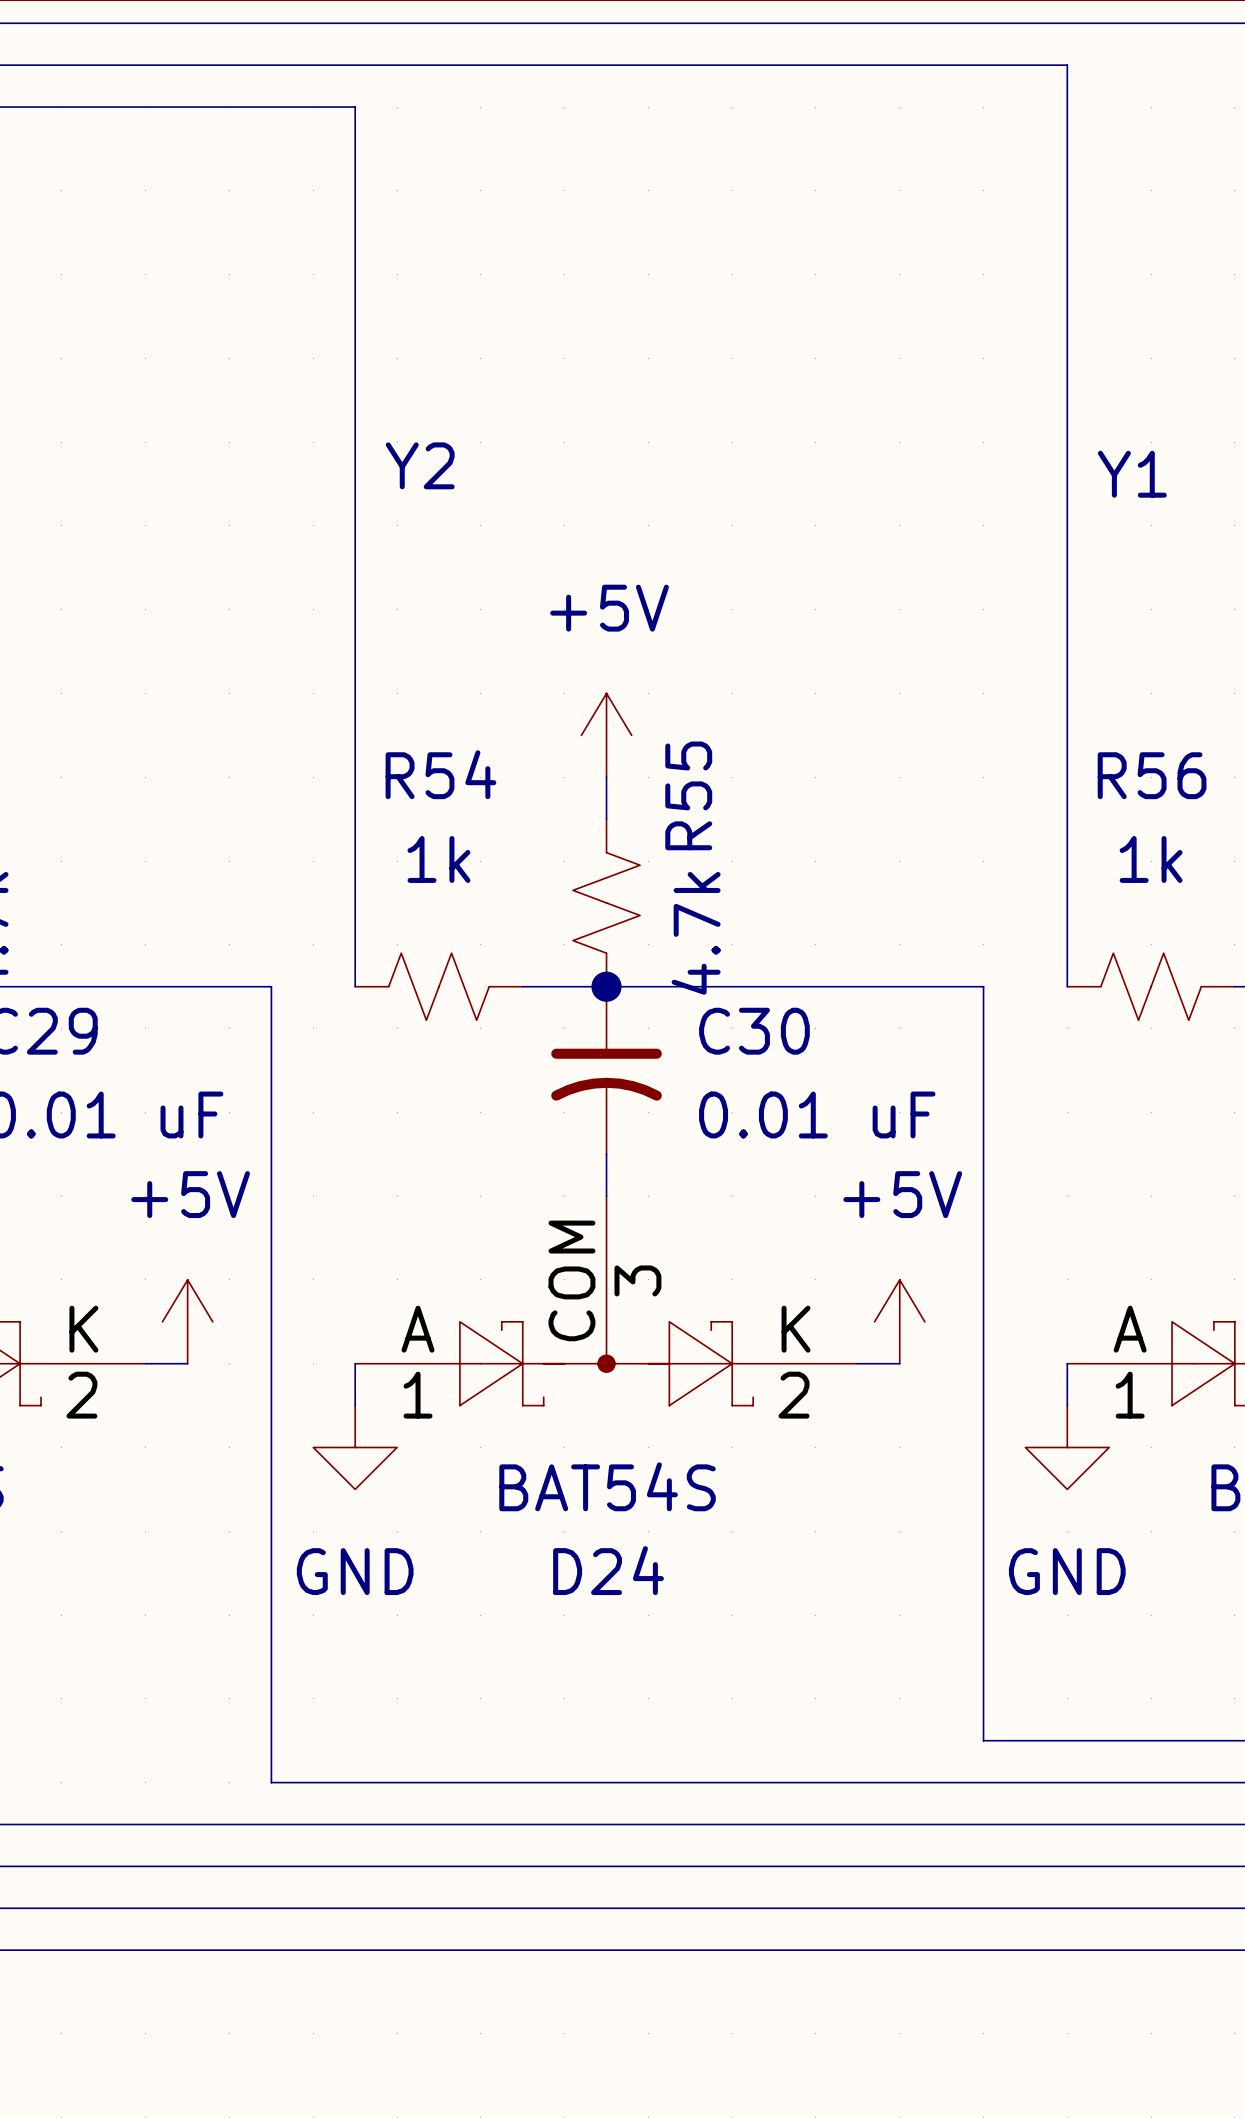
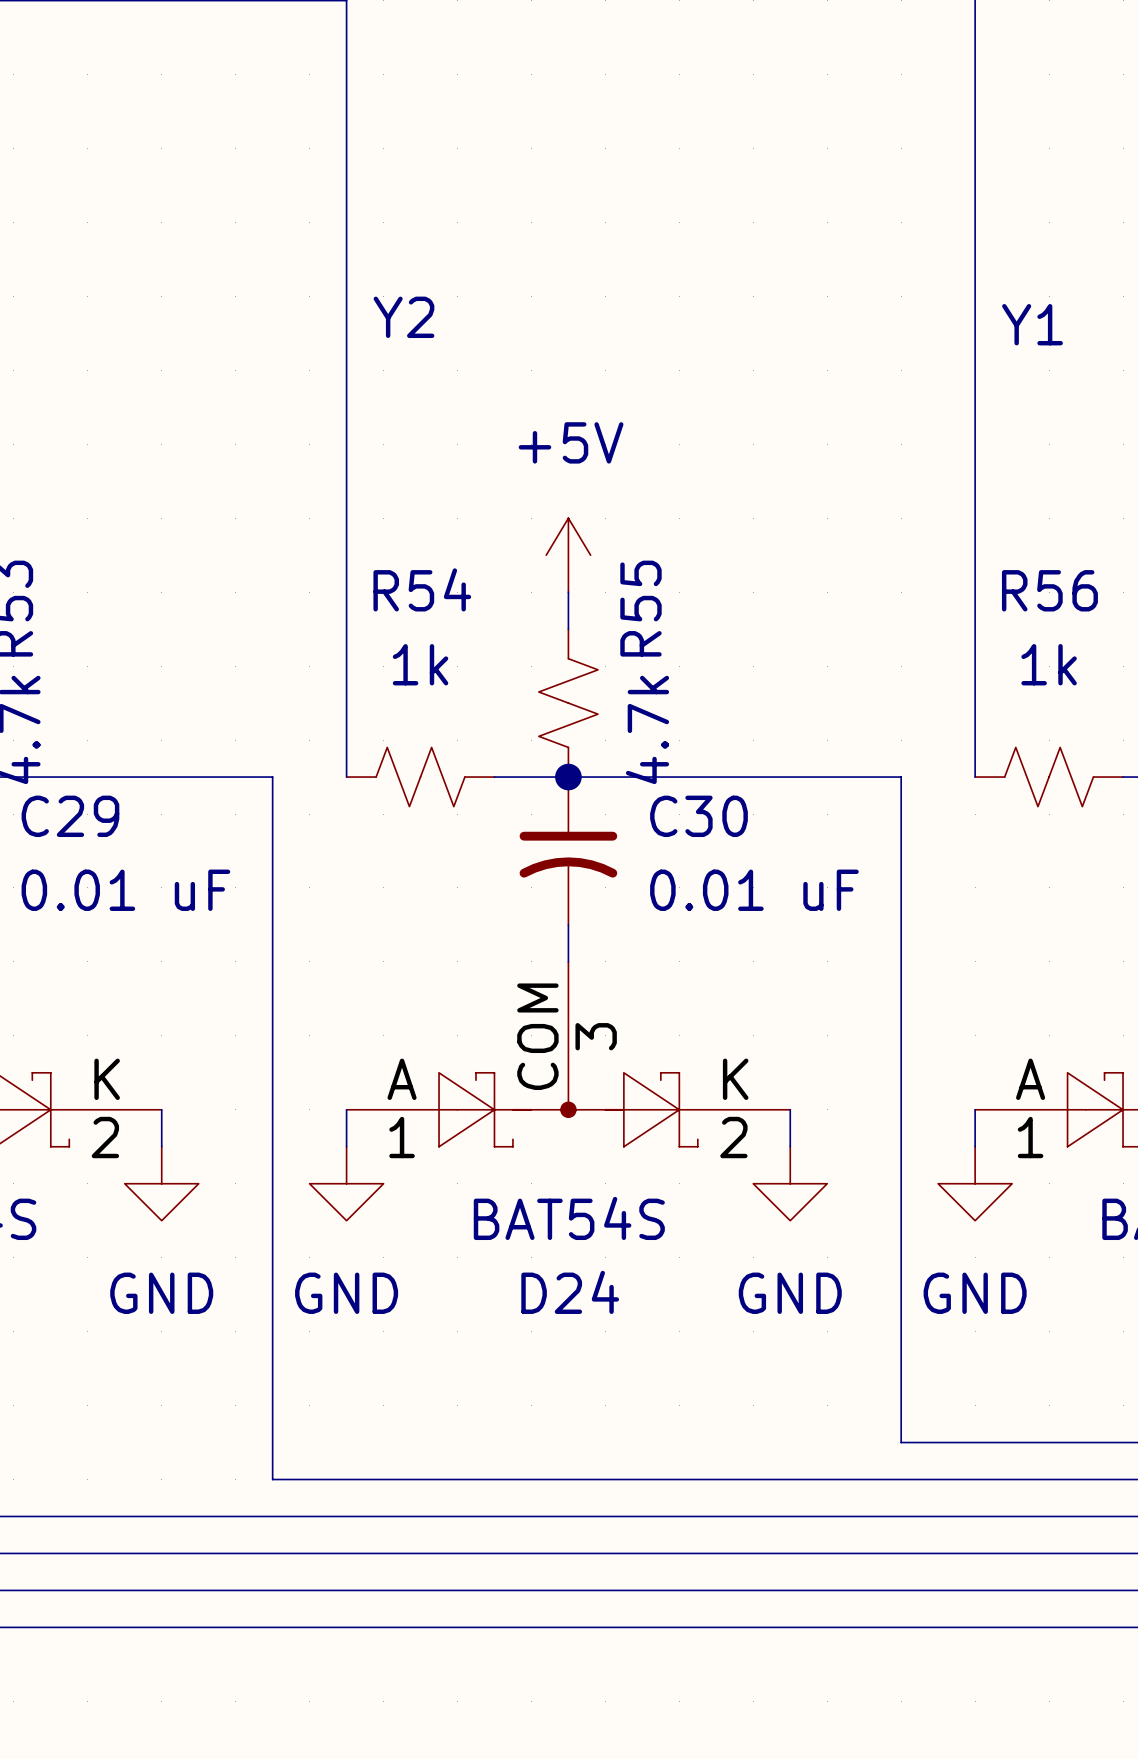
power symbol: +5V (187, 1321) -> none
power symbol: +5V (899, 1321) -> none
wire: (145, 1363) (187, 1363) -> (161, 1109) (161, 1146)
wire: (857, 1363) (899, 1363) -> (790, 1109) (790, 1146)
power symbol: none -> GND (161, 1183)
power symbol: none -> GND (790, 1183)

